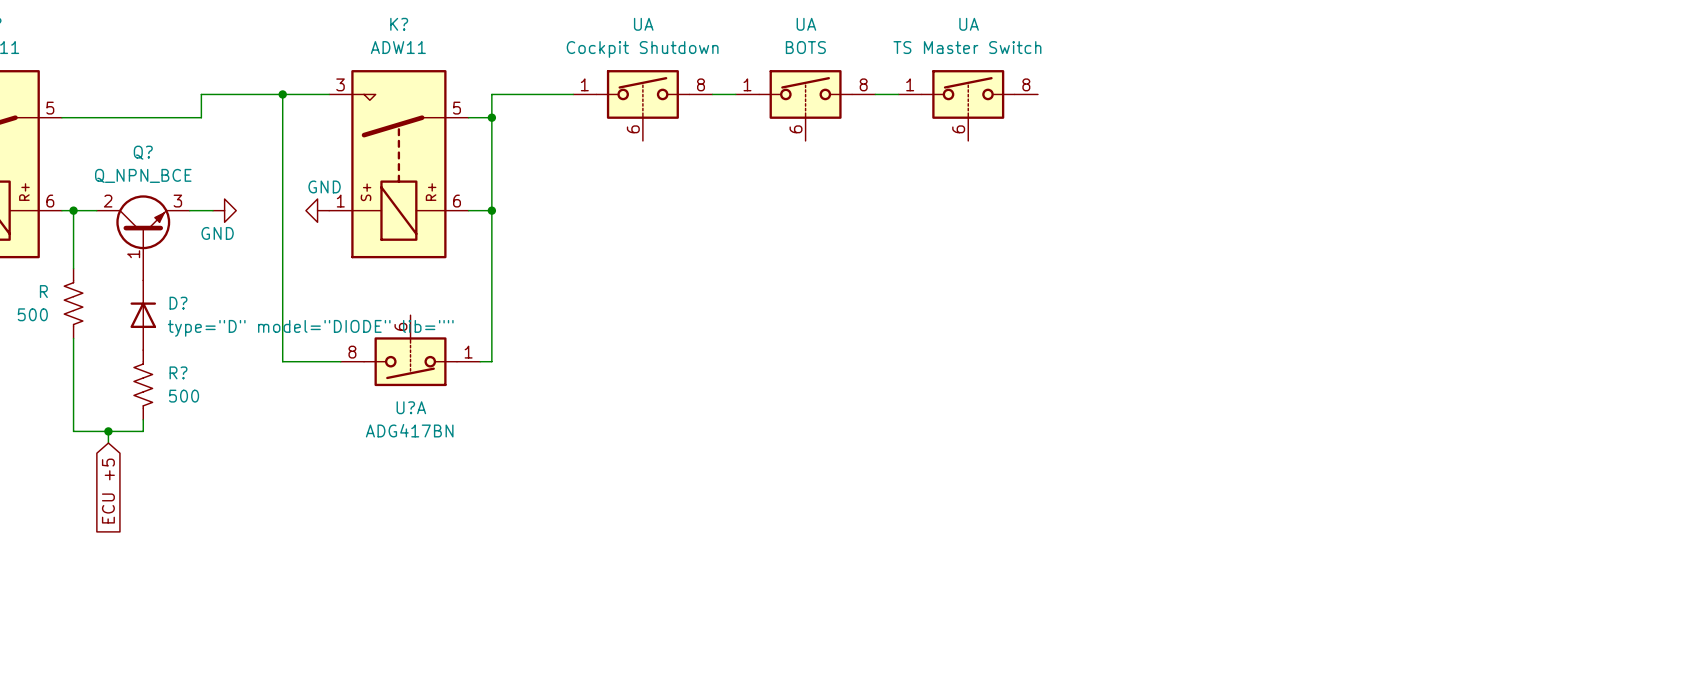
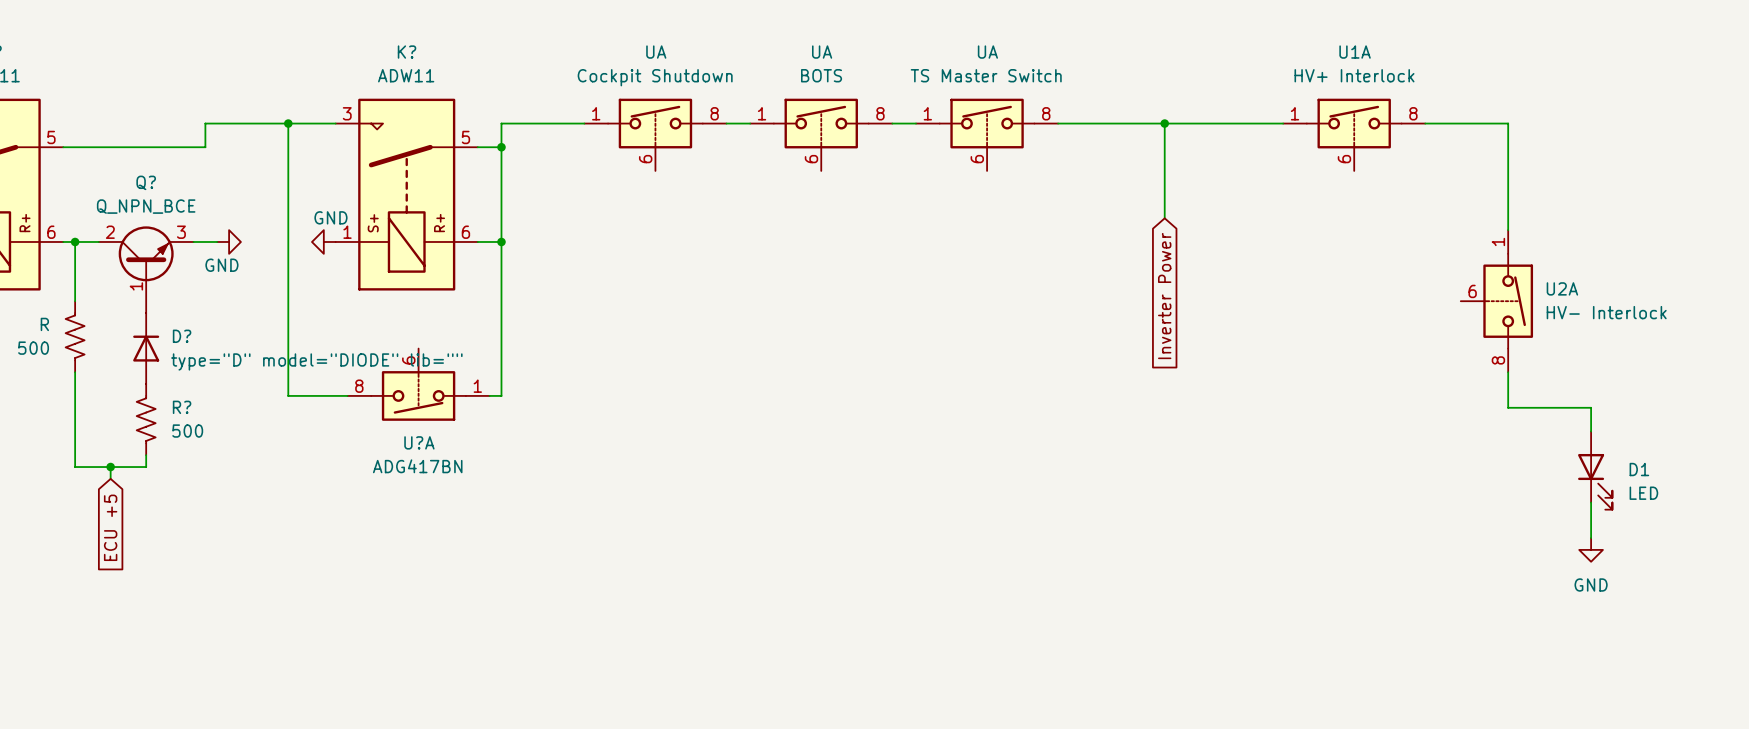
wire: none -> (1058, 123) (1283, 123)
wire: none -> (1164, 123) (1164, 218)
junction: none -> (1164, 123)
wire: none -> (1425, 123) (1508, 123) (1508, 230)
U1A: none -> HV+ Interlock (1354, 134)
global label: none -> Inverter Power (1164, 296)
U2A: none -> HV- Interlock (1496, 301)
wire: none -> (1508, 372) (1508, 407) (1591, 407) (1591, 431)
D1: none -> LED (1595, 470)
wire: none -> (1591, 502) (1591, 538)
power symbol: none -> GND (1591, 549)

